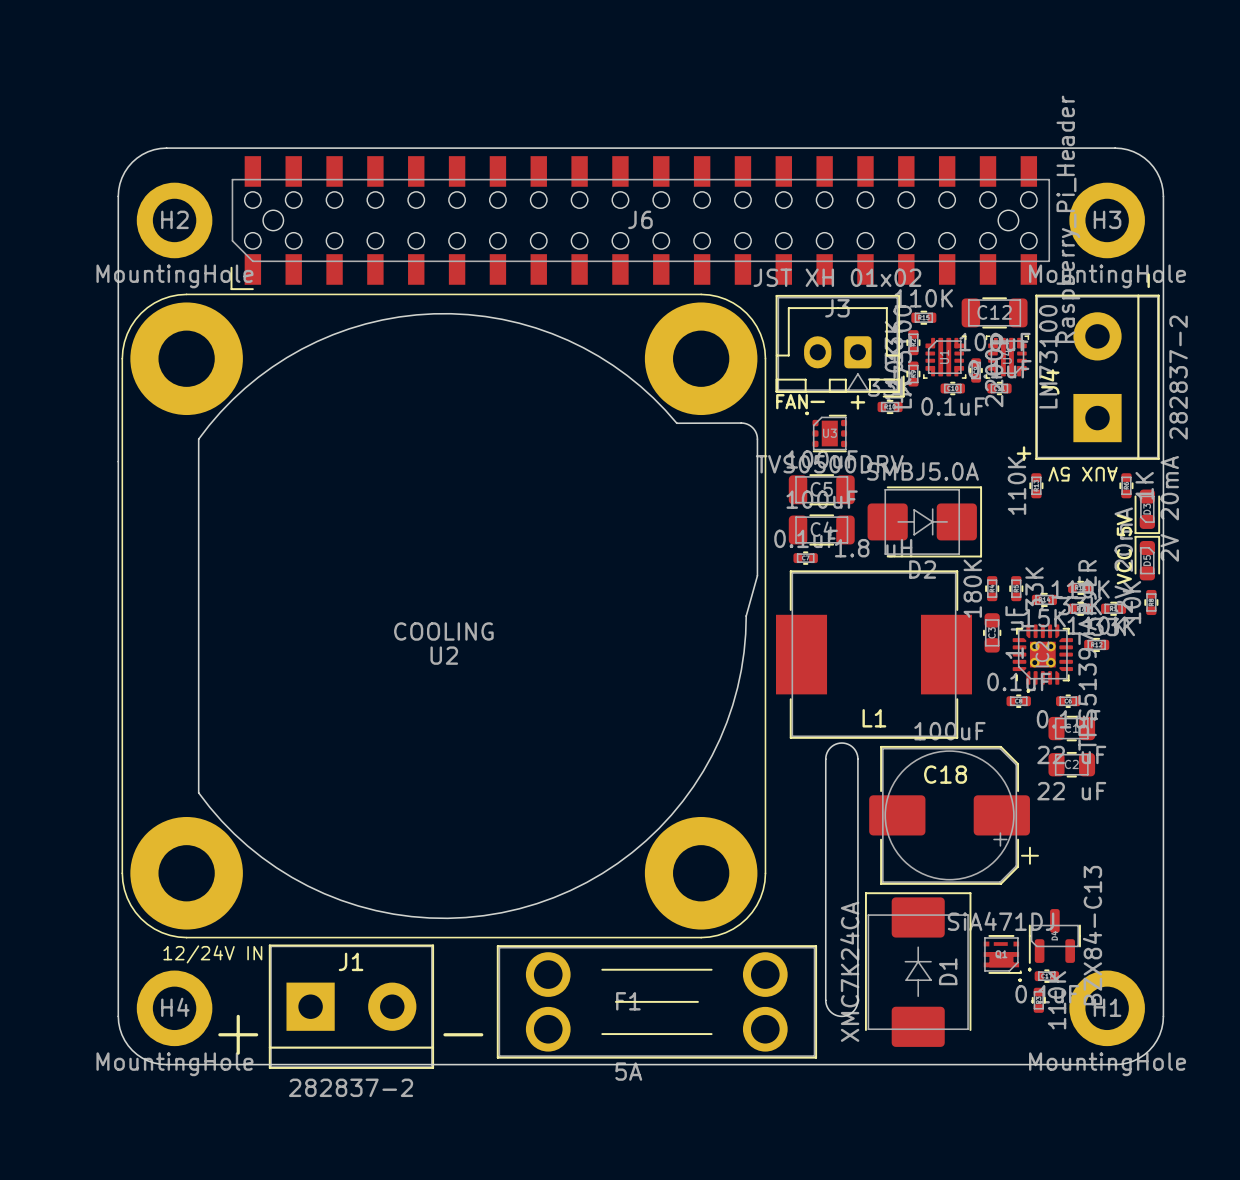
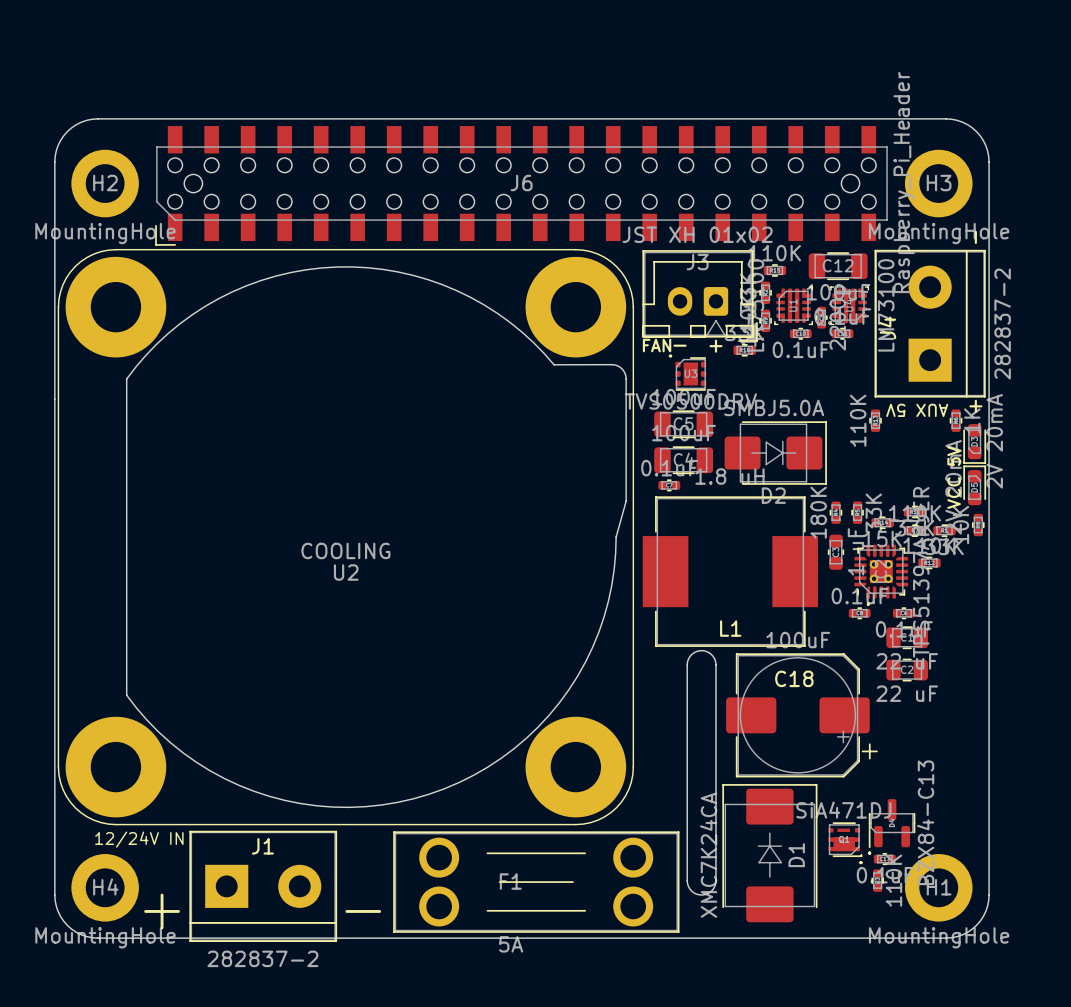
text position: + (1024, 453) -> + (975, 406)

